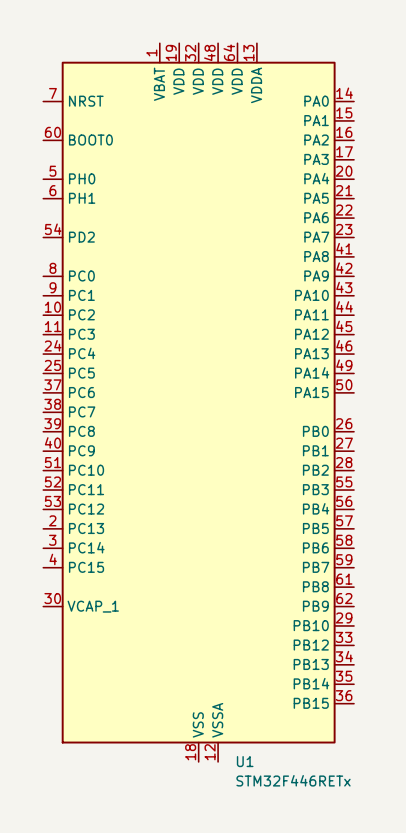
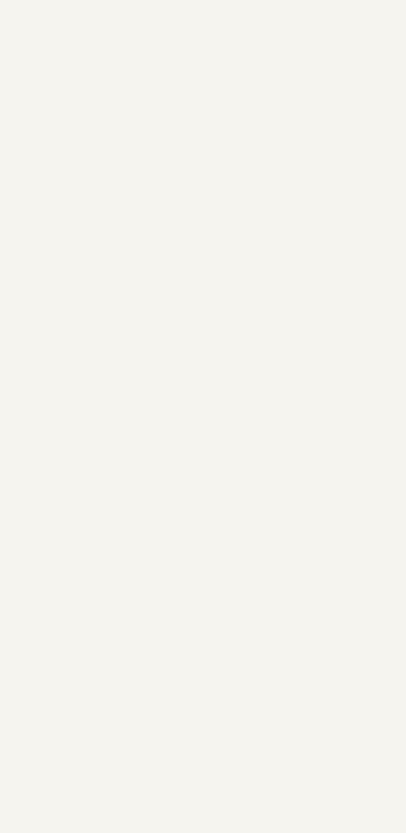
U1: STM32F446RETx (198, 402) -> none

